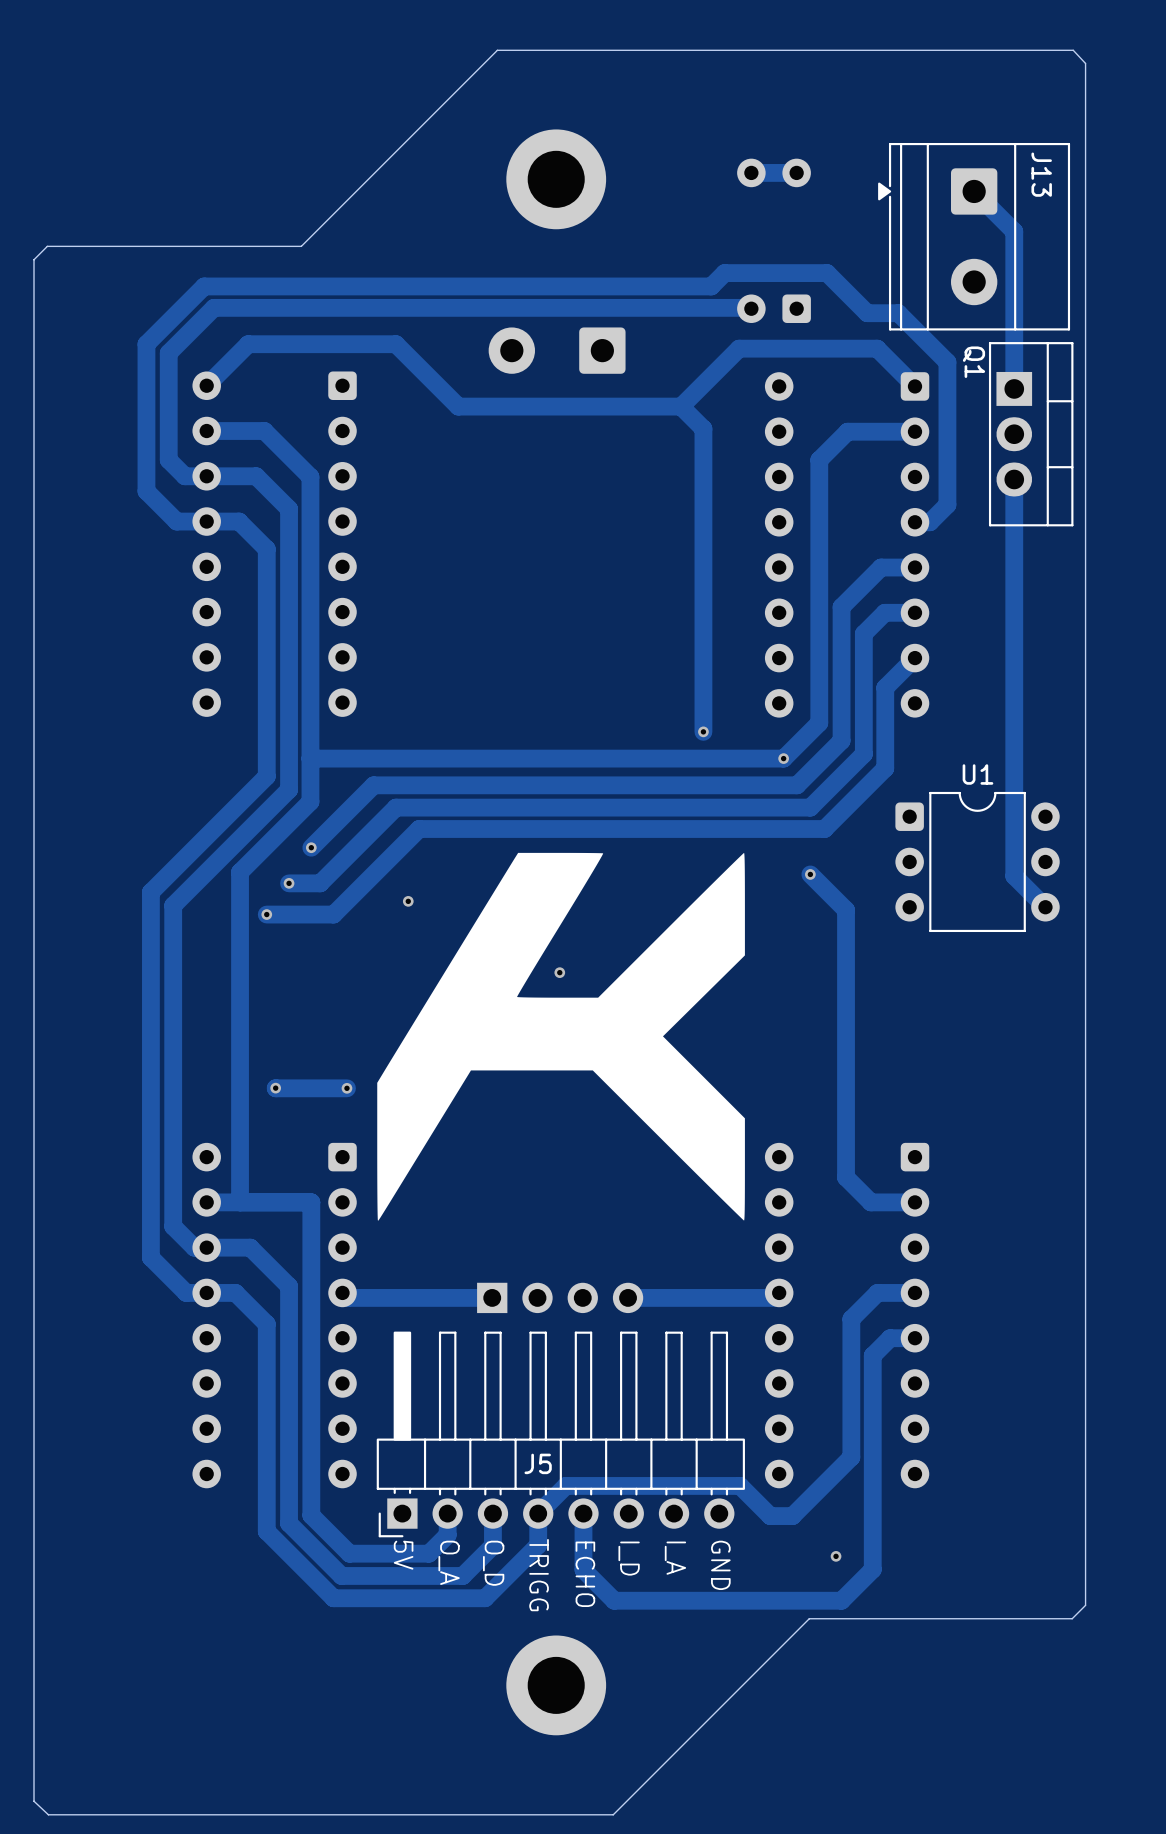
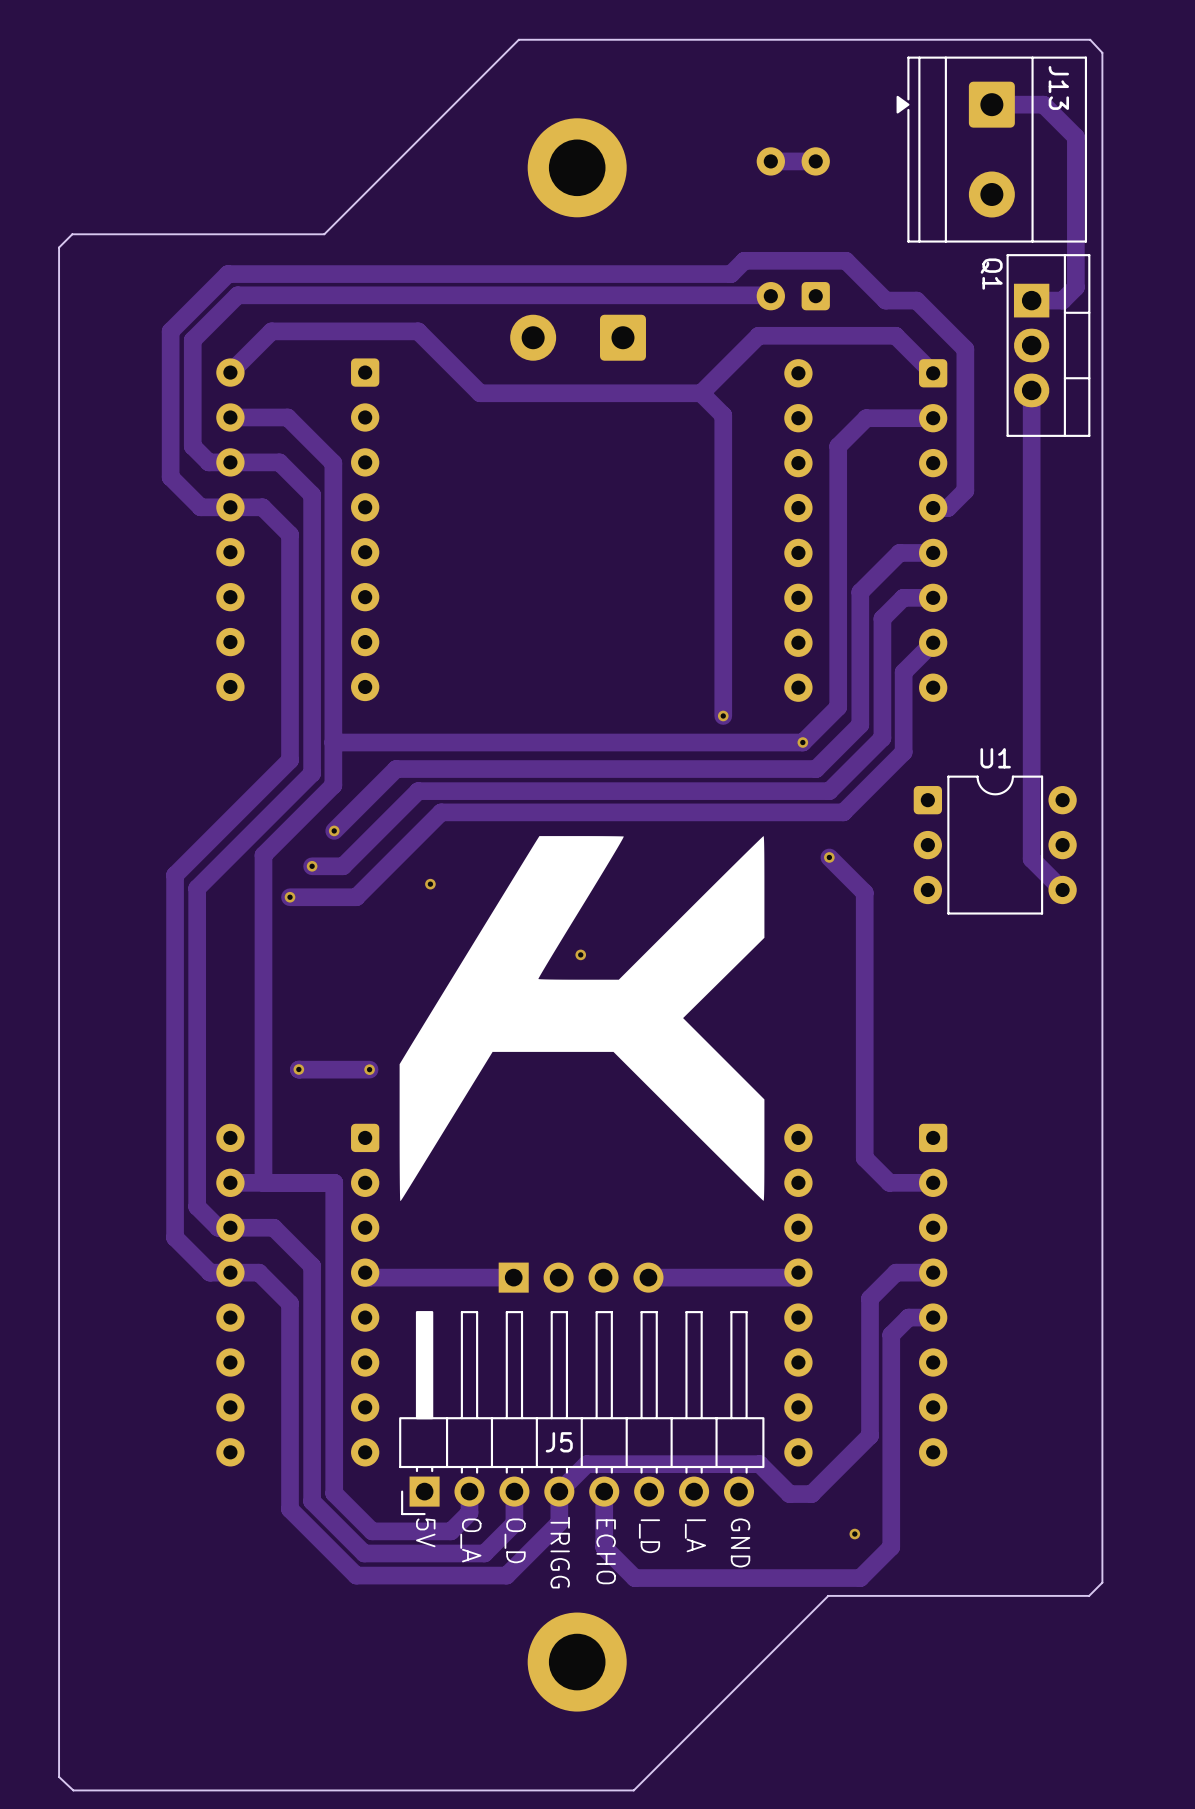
track: none -> (991, 104) (1043, 104) (1075, 137) (1075, 287) (1062, 300) (1031, 300)
track: (974, 191) (1014, 231) (1014, 388) -> none
J13 position: (974, 236) -> (991, 149)
track: none -> (1031, 390) (1031, 465)
Q1 position: (1031, 434) -> (1048, 345)

